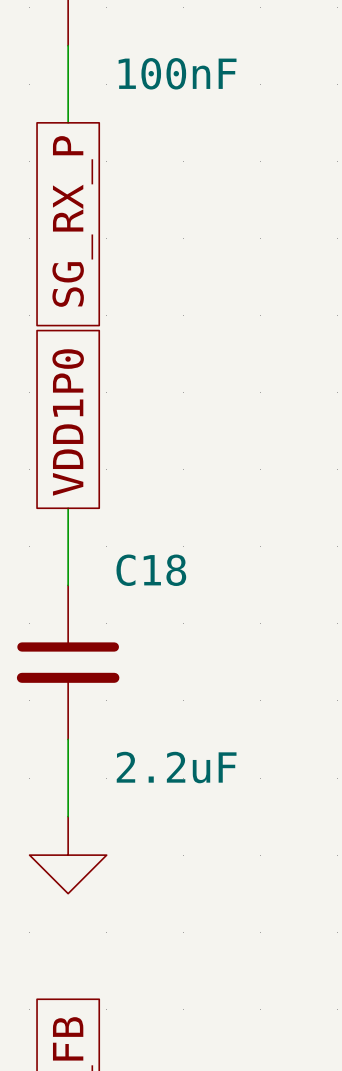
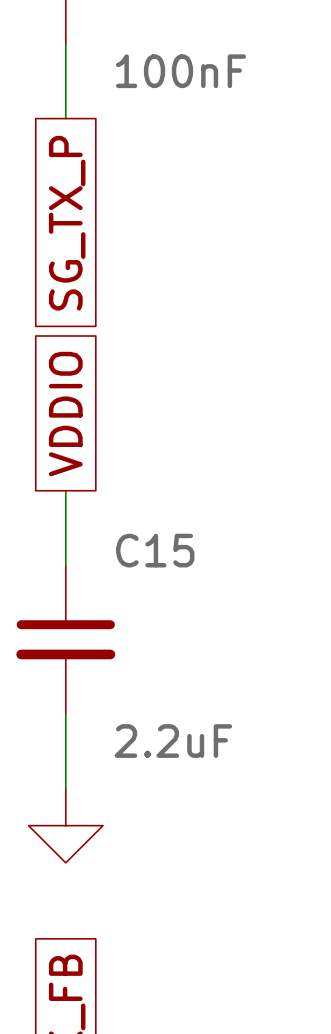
global label: SG_RX_P (72, 221) -> SG_TX_P (67, 223)
global label: VDD1P0 (68, 422) -> VDDIO (65, 414)
C18 name: C18 (151, 570) -> C15 (155, 550)

